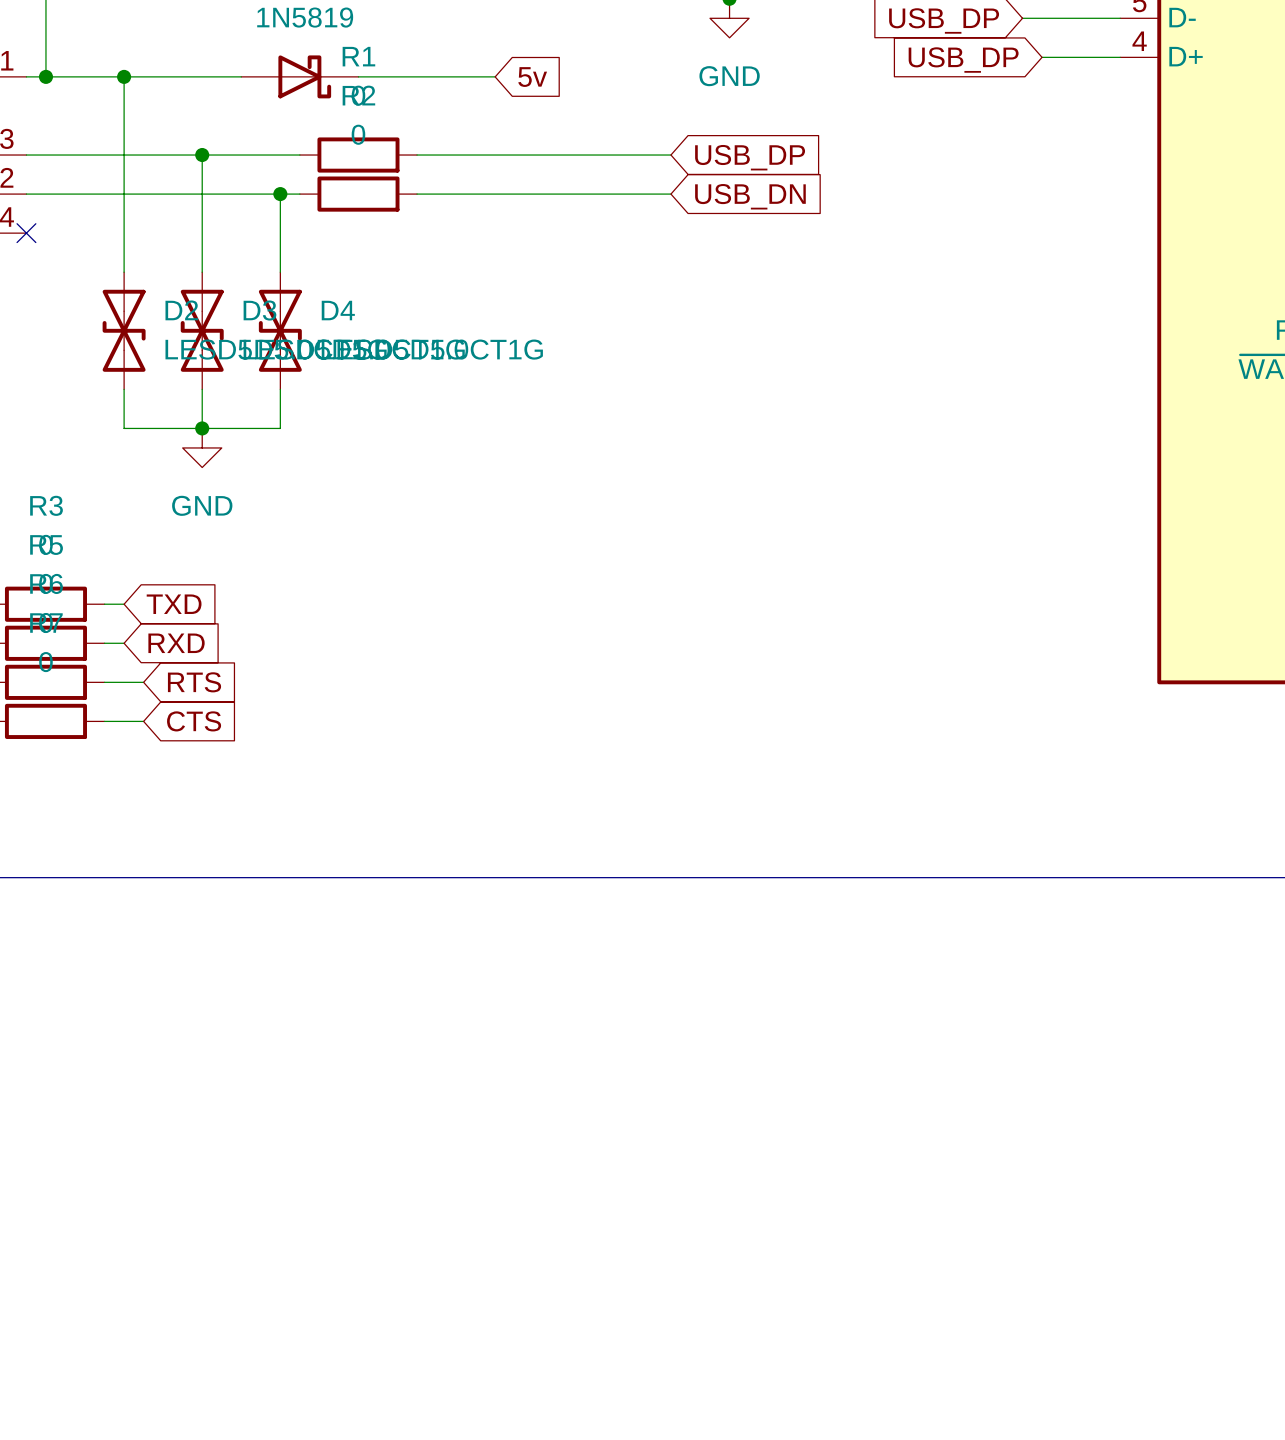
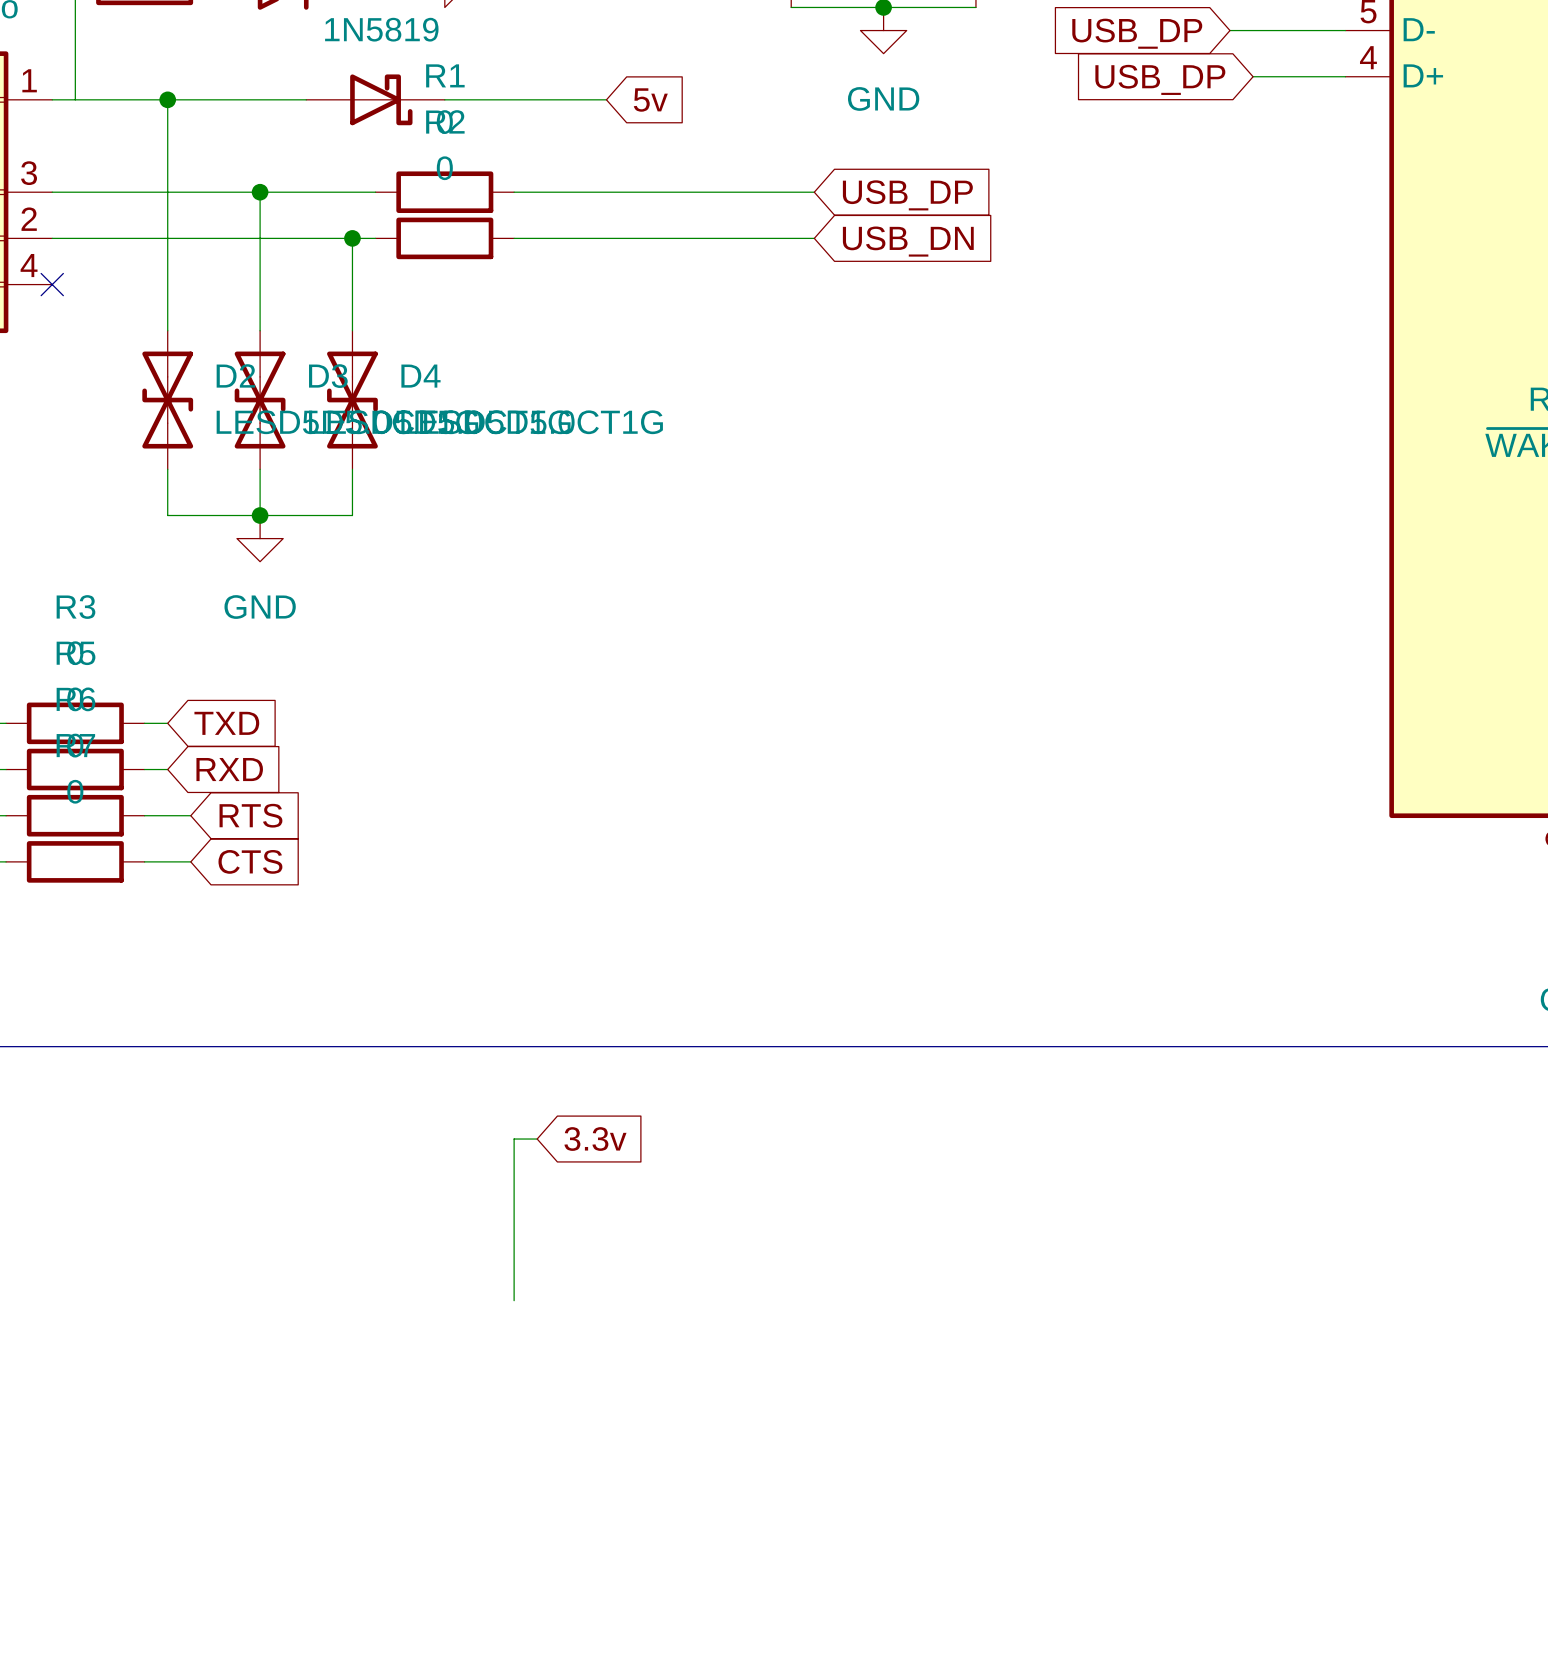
junction: (45, 76) -> none
wire: none -> (537, 1139) (514, 1139) (514, 1300)
global label: none -> 3.3v (595, 1139)

